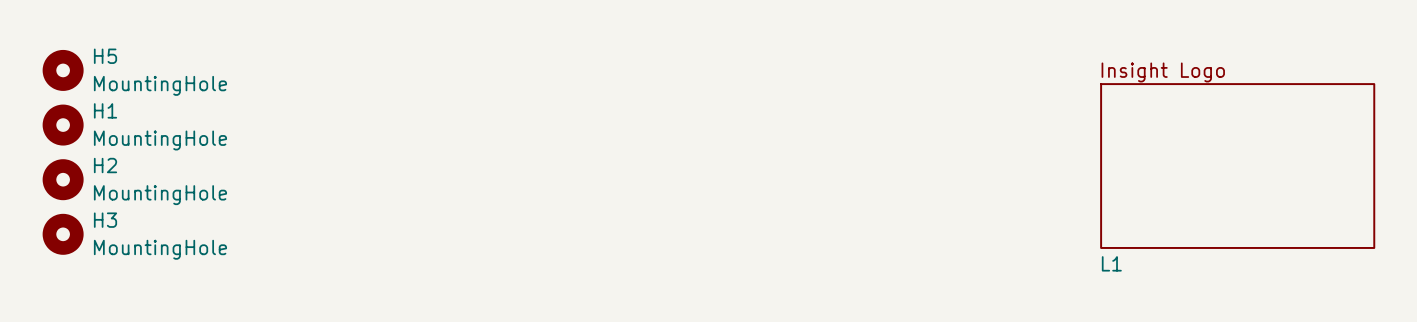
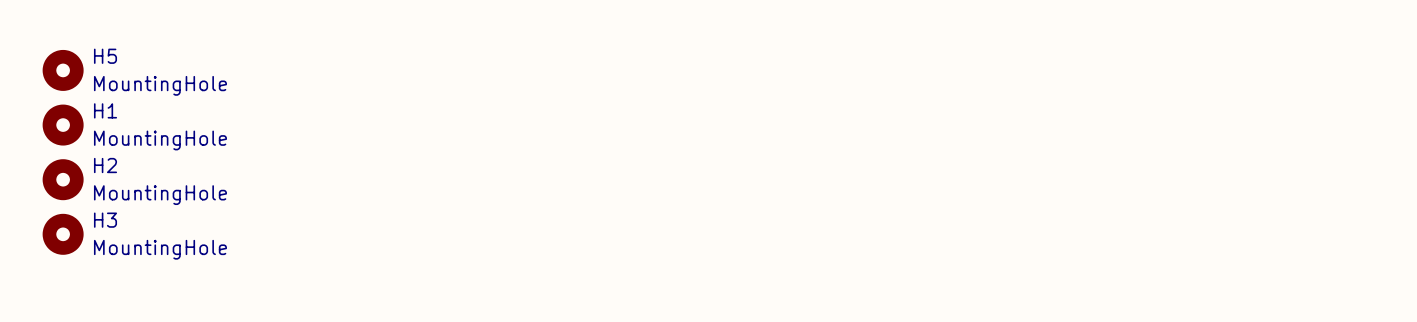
L1: (1237, 166) -> none

